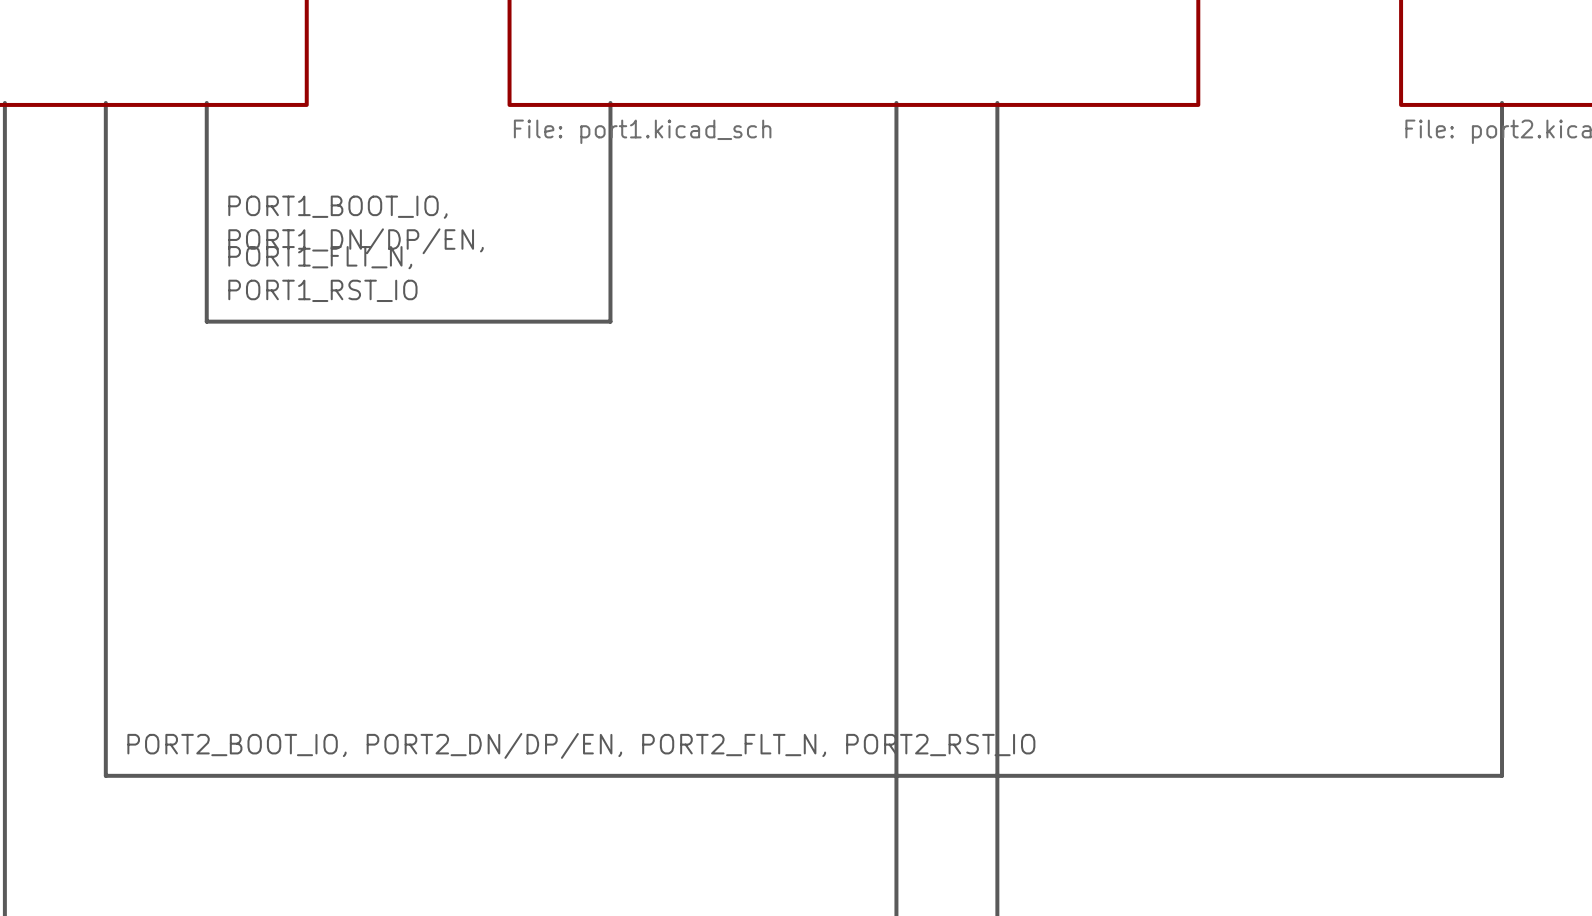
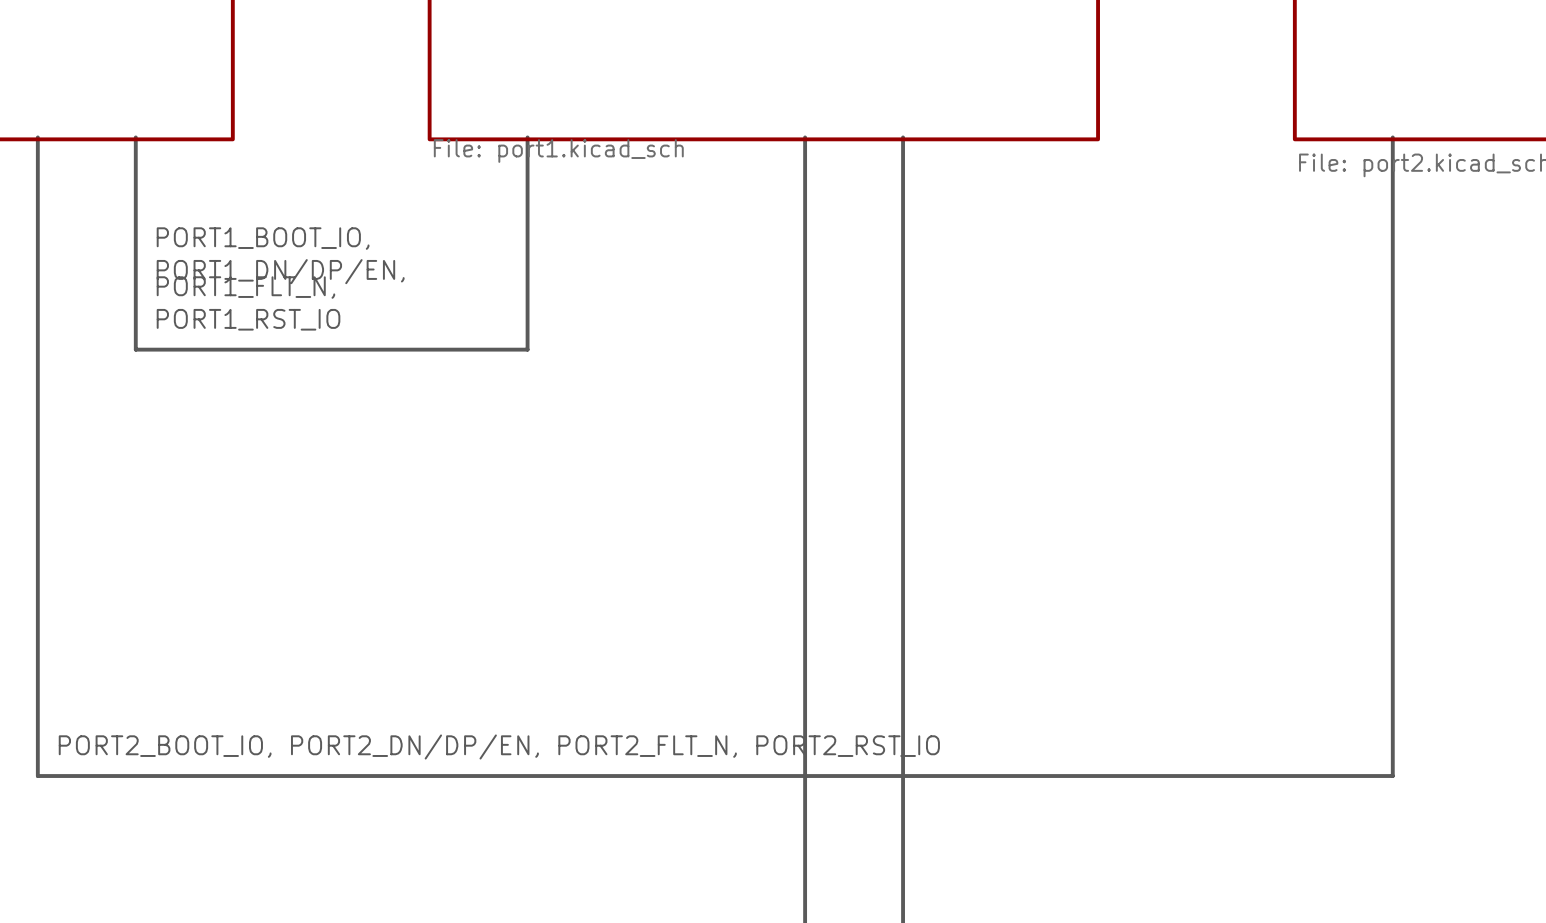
sheet value position: File: port1.kicad_sch (642, 131) -> File: port1.kicad_sch (558, 151)
text position: PORT2_BOOT_IO, PORT2_DN/DP/EN, PORT2_FLT_N, PORT2_RST_IO (581, 745) -> PORT2_BOOT_IO, PORT2_DN/DP/EN, PORT2_FLT_N, PORT2_RST_IO (499, 746)
line: (105, 760) (105, 775) (1502, 775) (1502, 760) -> (37, 776) (1392, 776)

